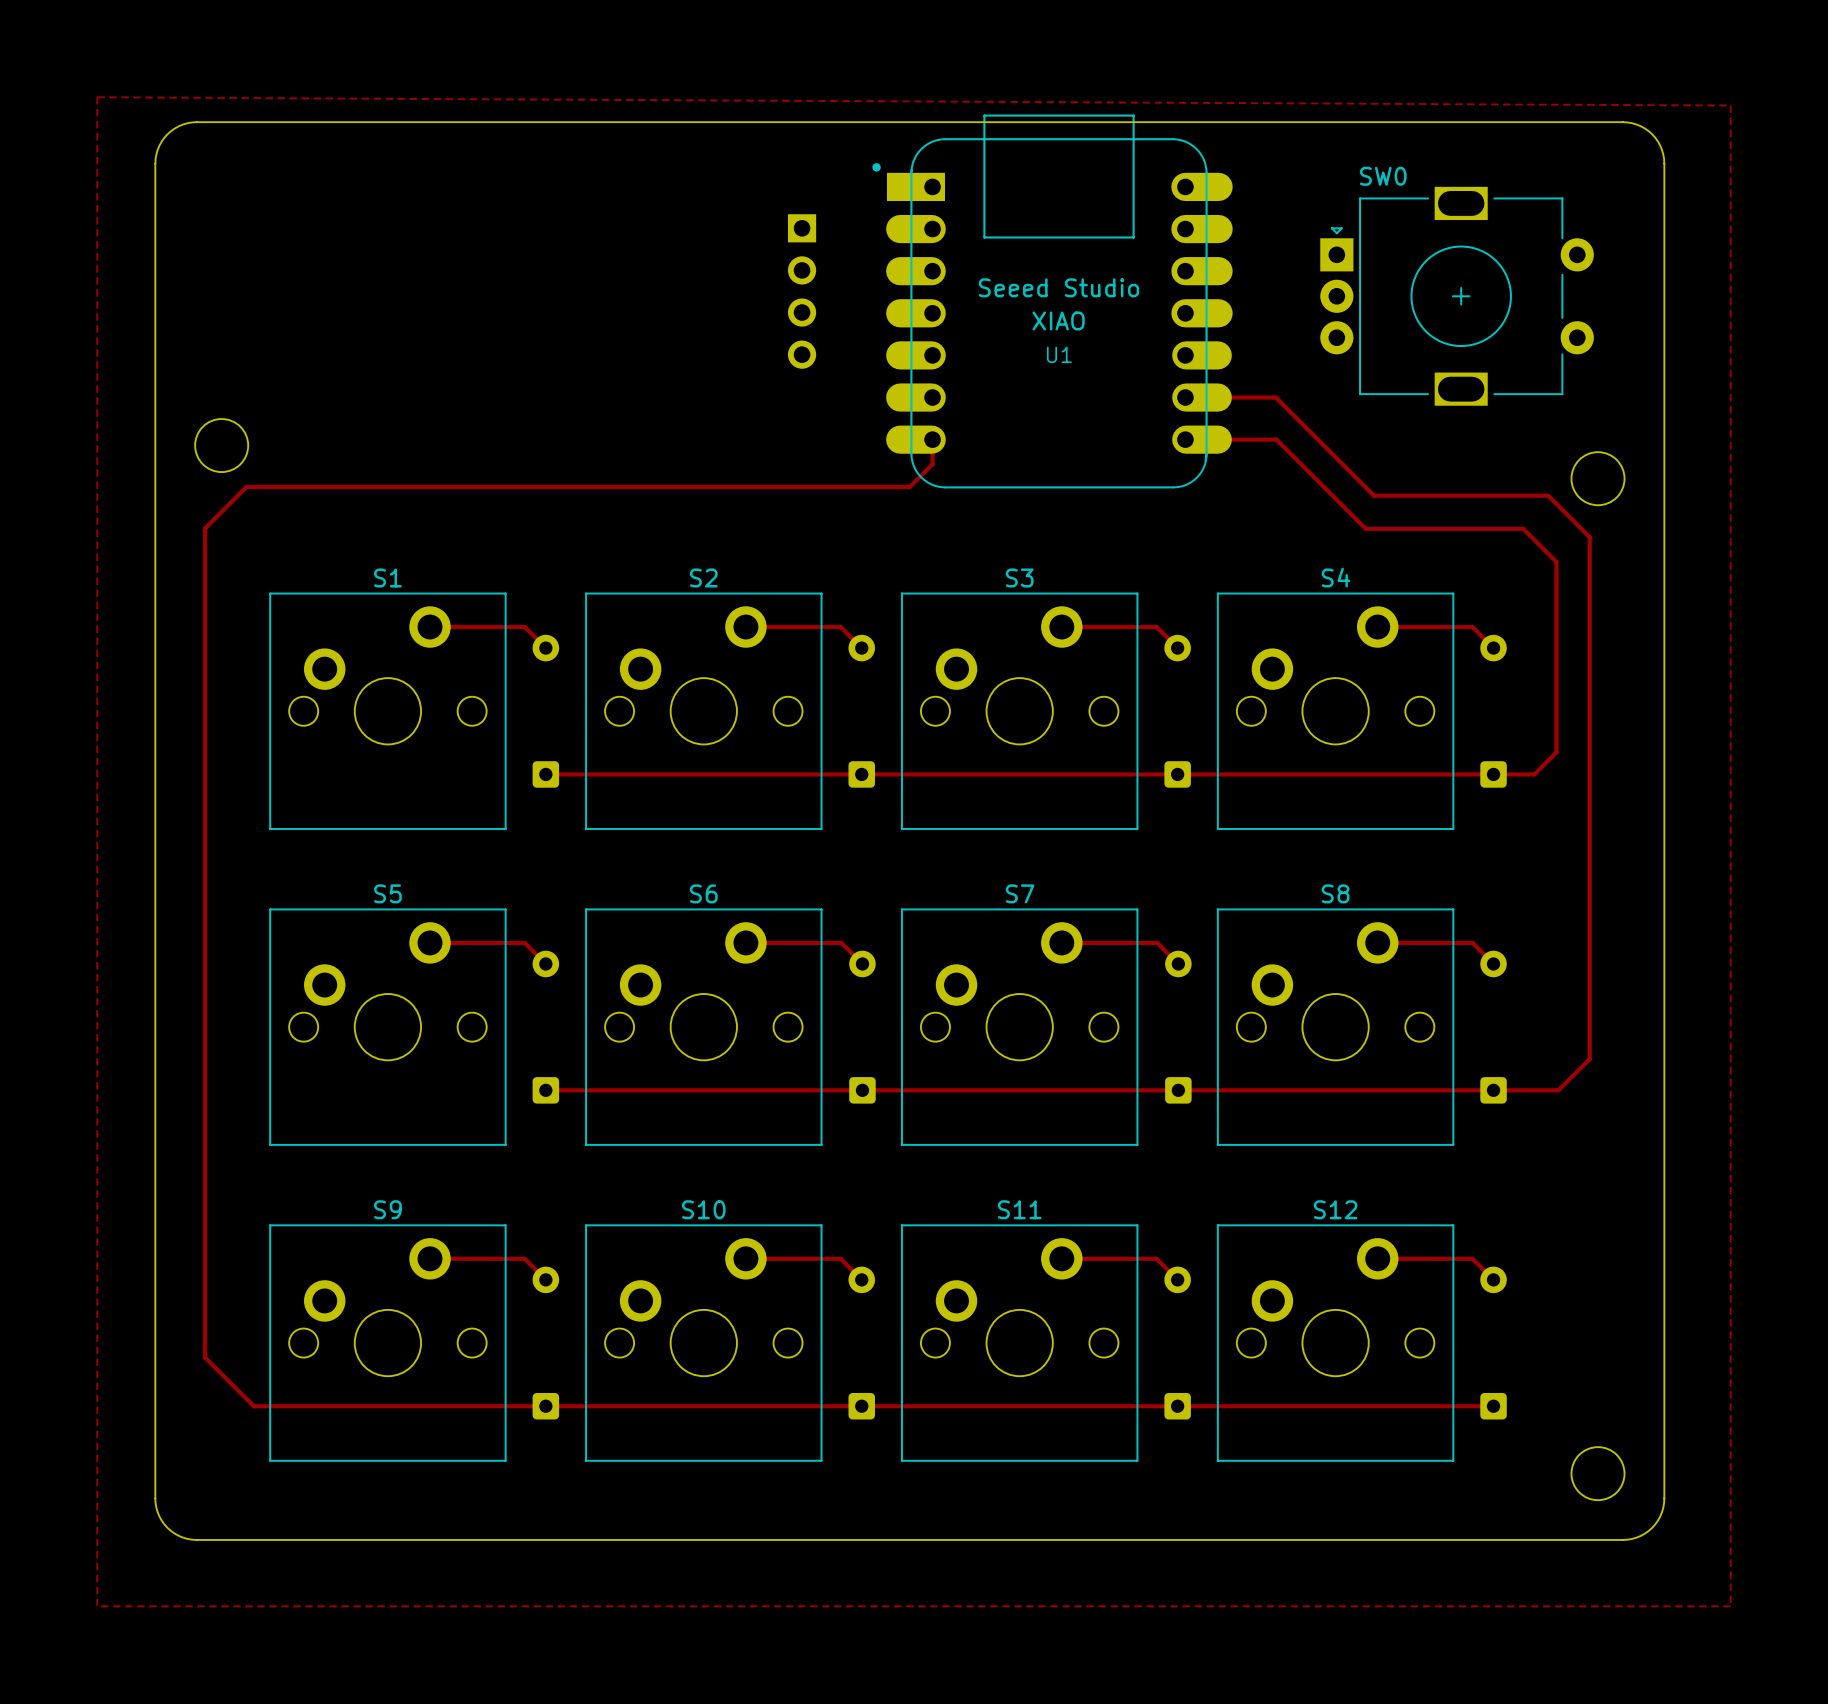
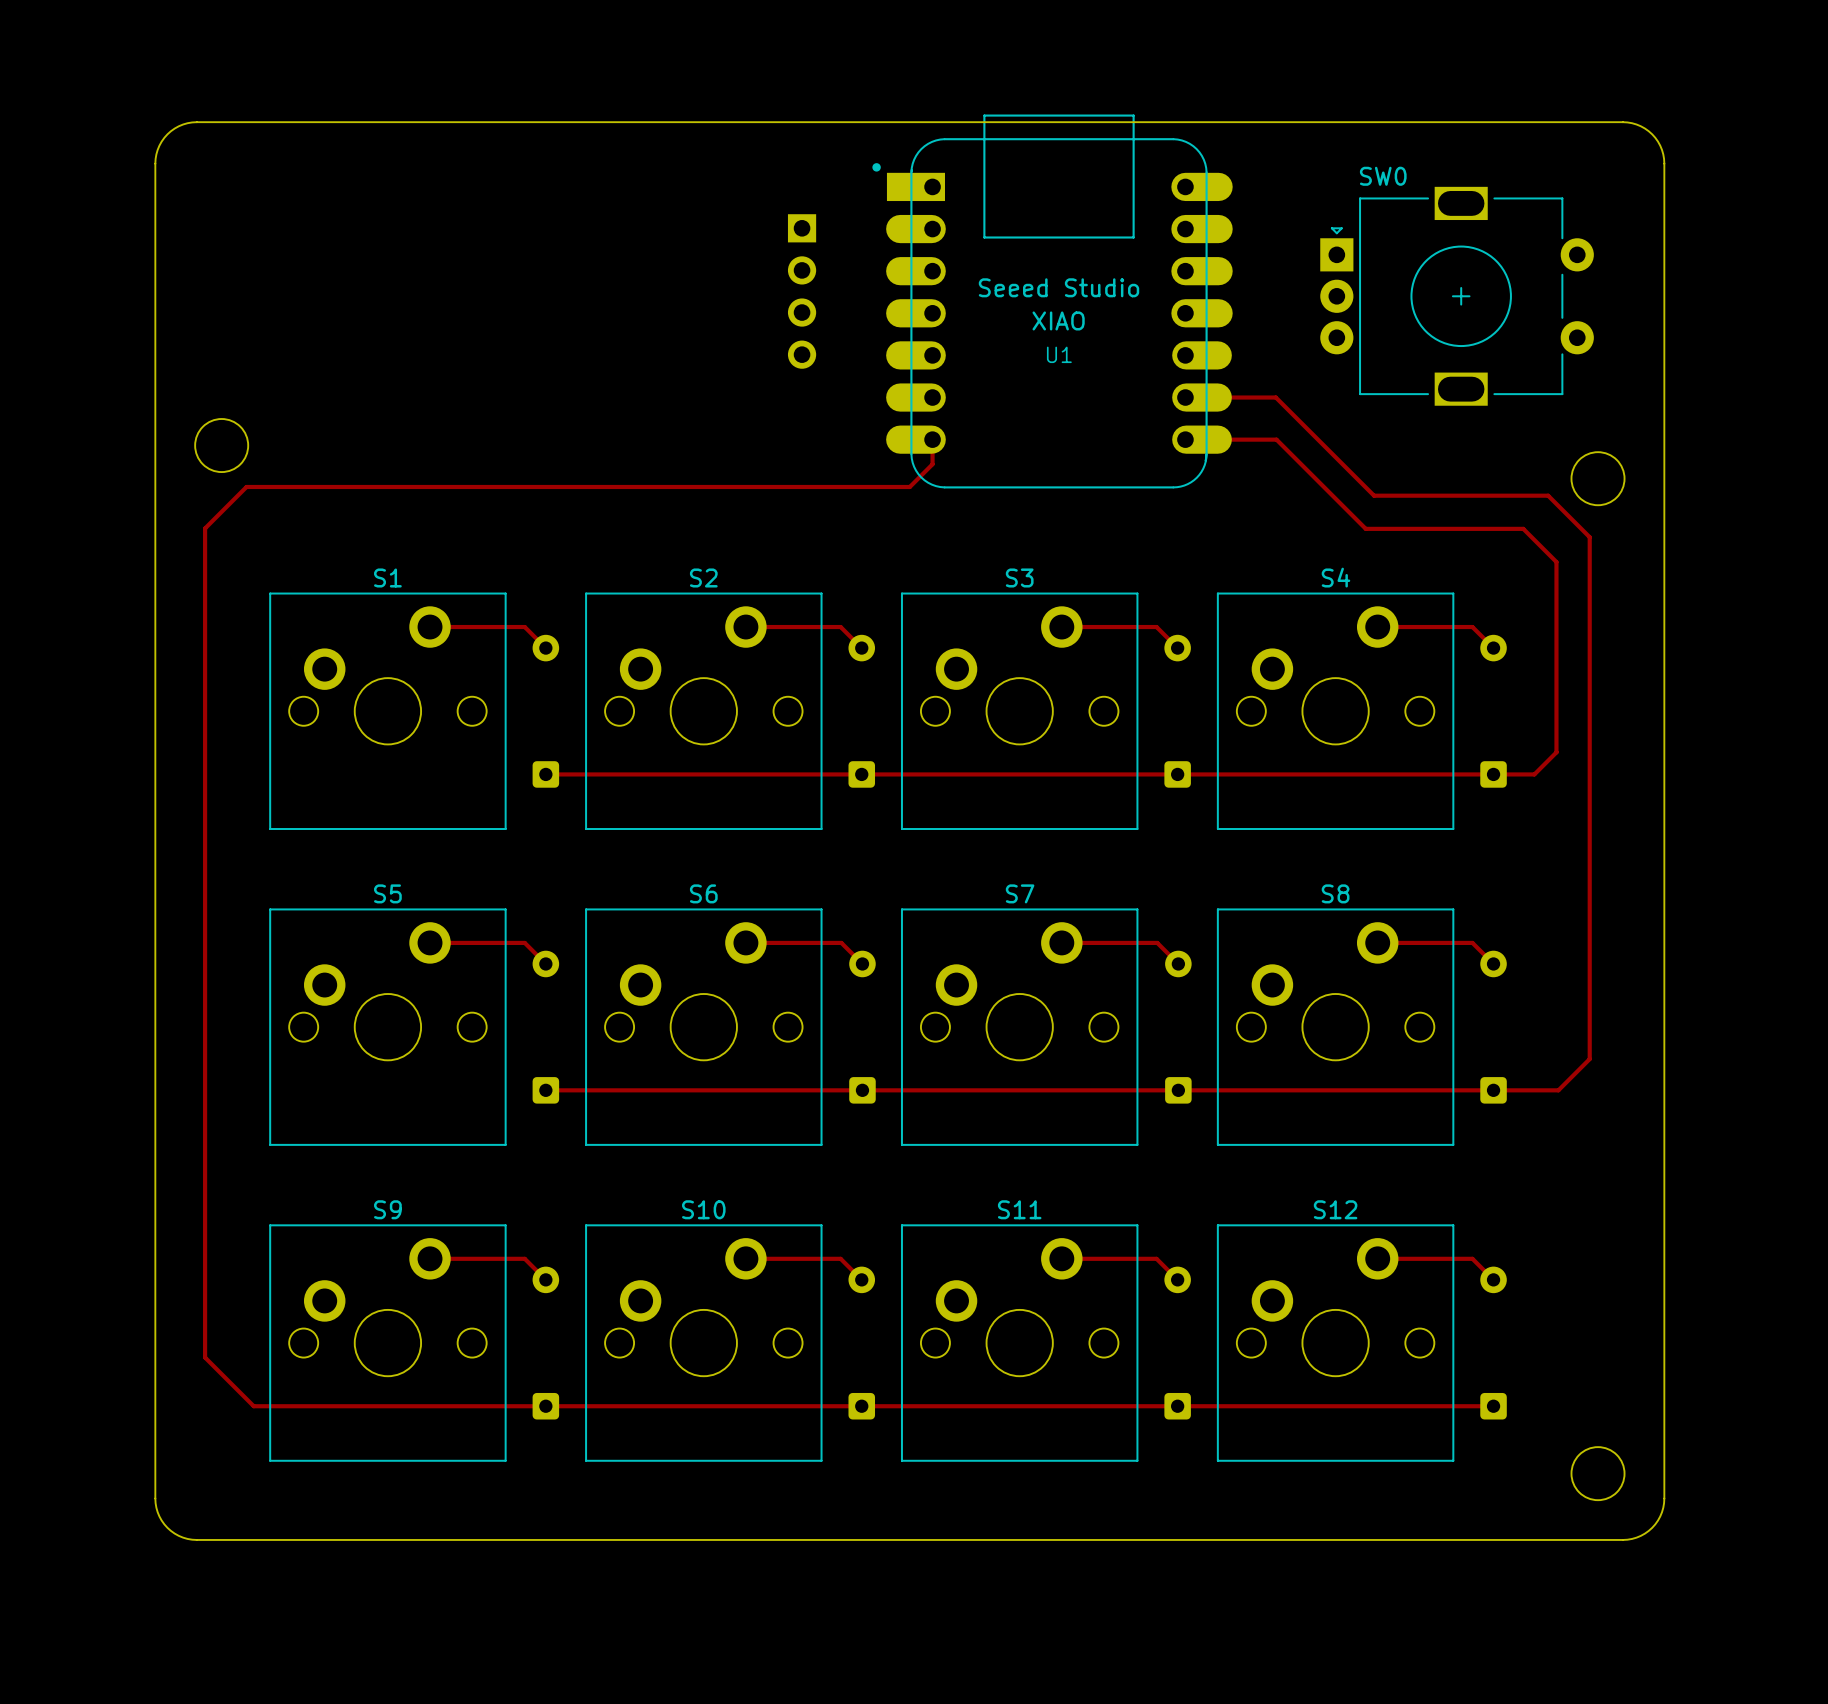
zone outline: (97, 97) (1730, 105) (1730, 1606) (97, 1606) (97, 97) -> none

